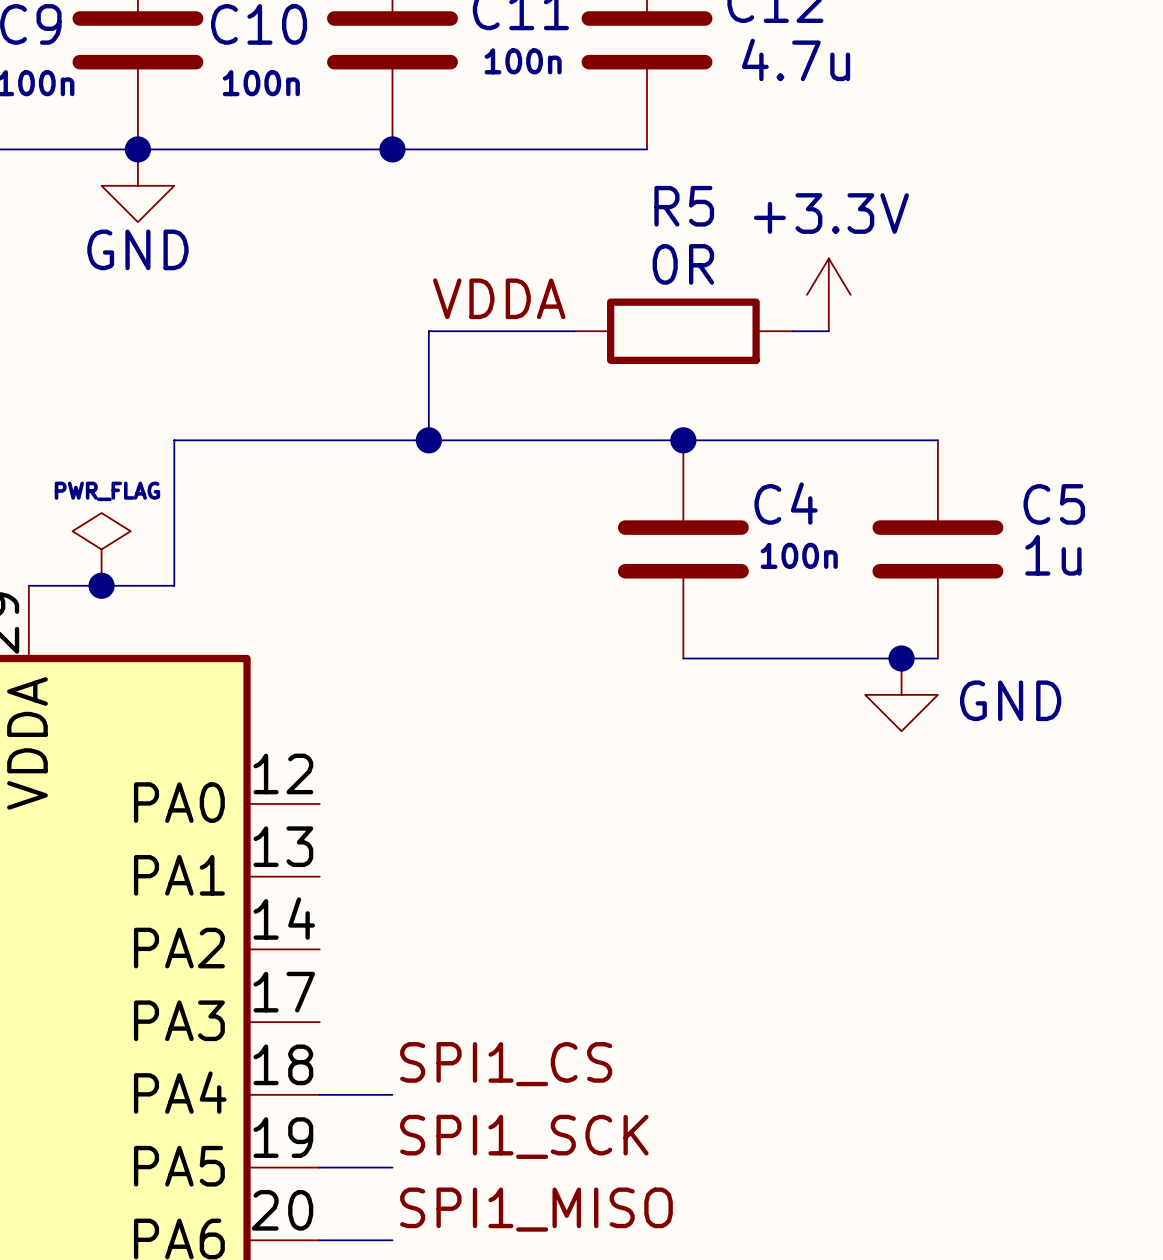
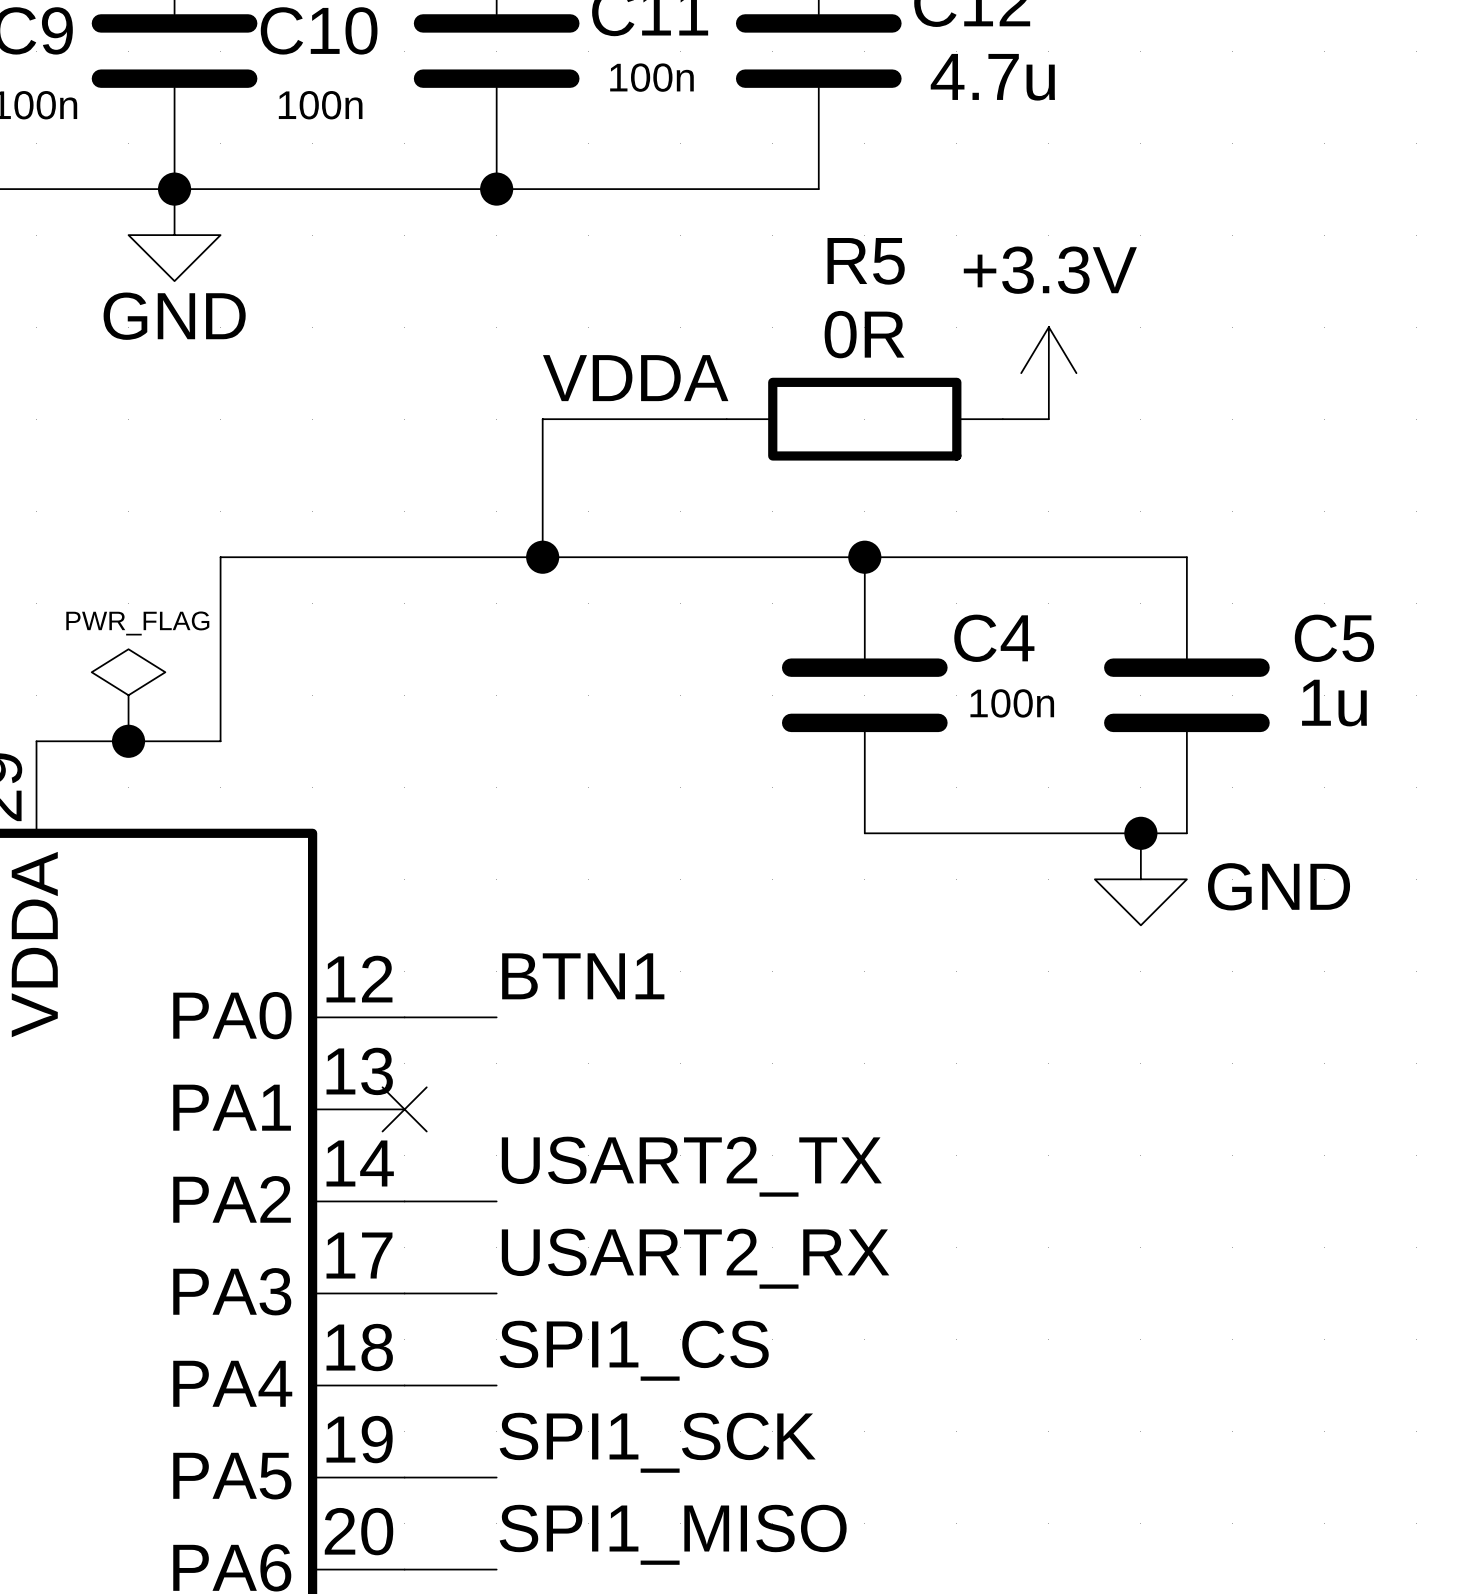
label: none -> BTN1 (583, 976)
wire: none -> (404, 1017) (496, 1017)
no-connect mark: none -> (404, 1109)
label: none -> USART2_TX (691, 1166)
wire: none -> (404, 1201) (496, 1201)
label: none -> USART2_RX (695, 1258)
wire: none -> (404, 1293) (496, 1293)

